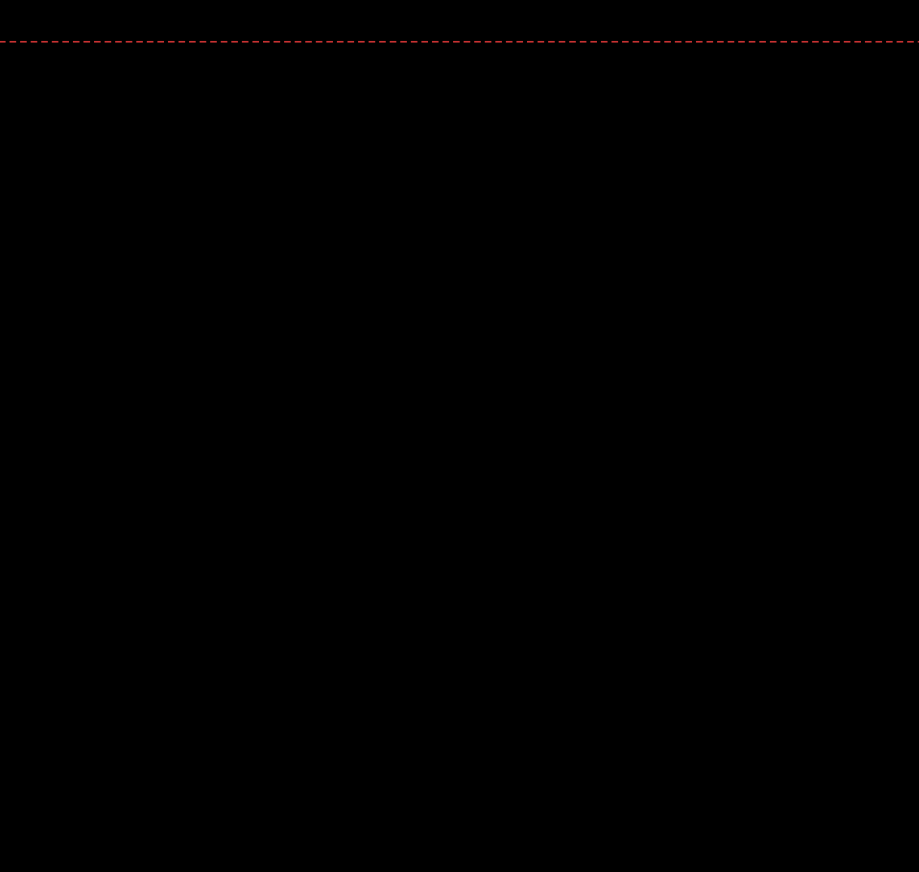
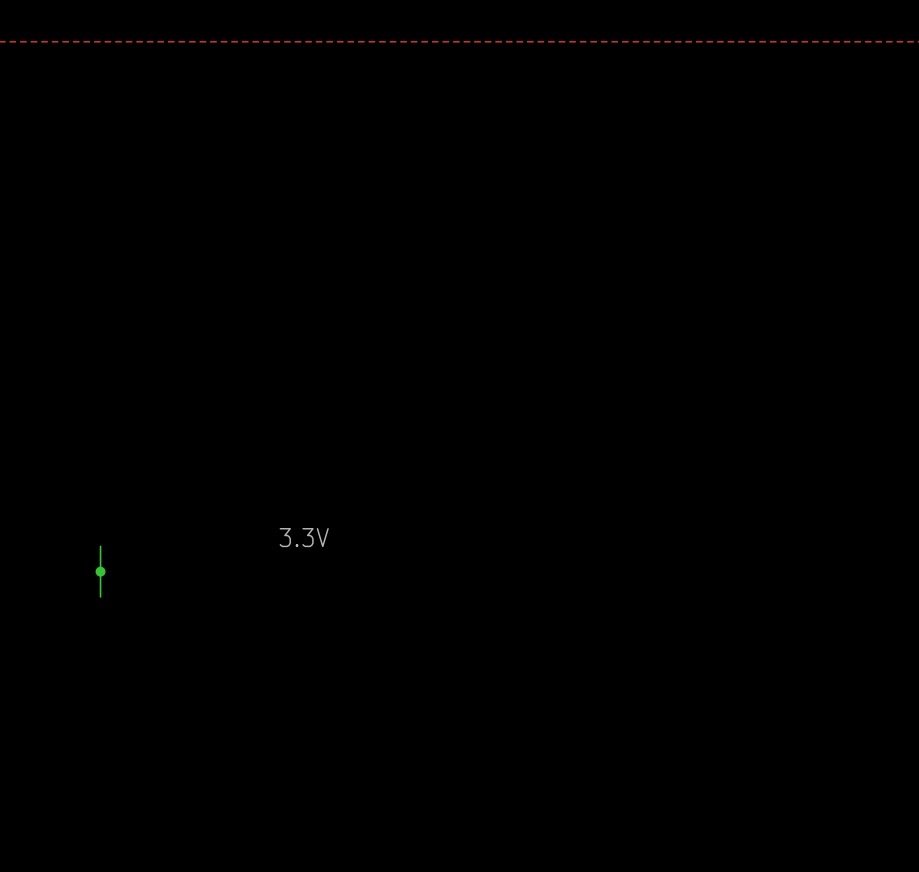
label: none -> 3.3V (304, 537)
wire: none -> (100, 546) (100, 596)
junction: none -> (100, 571)

